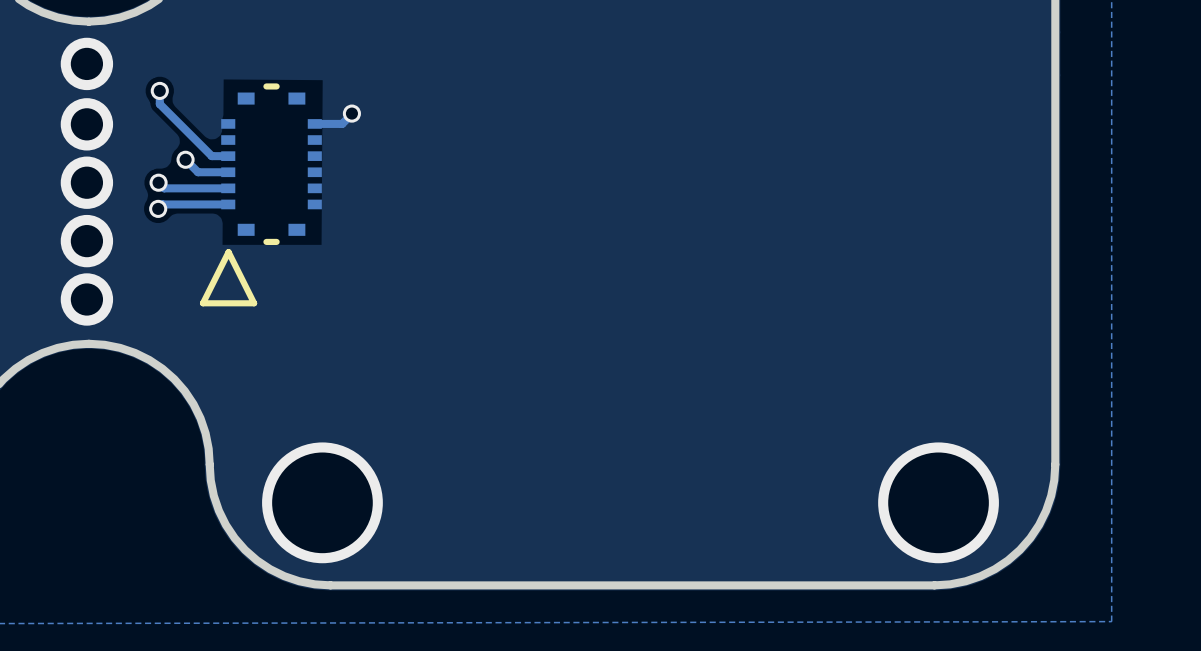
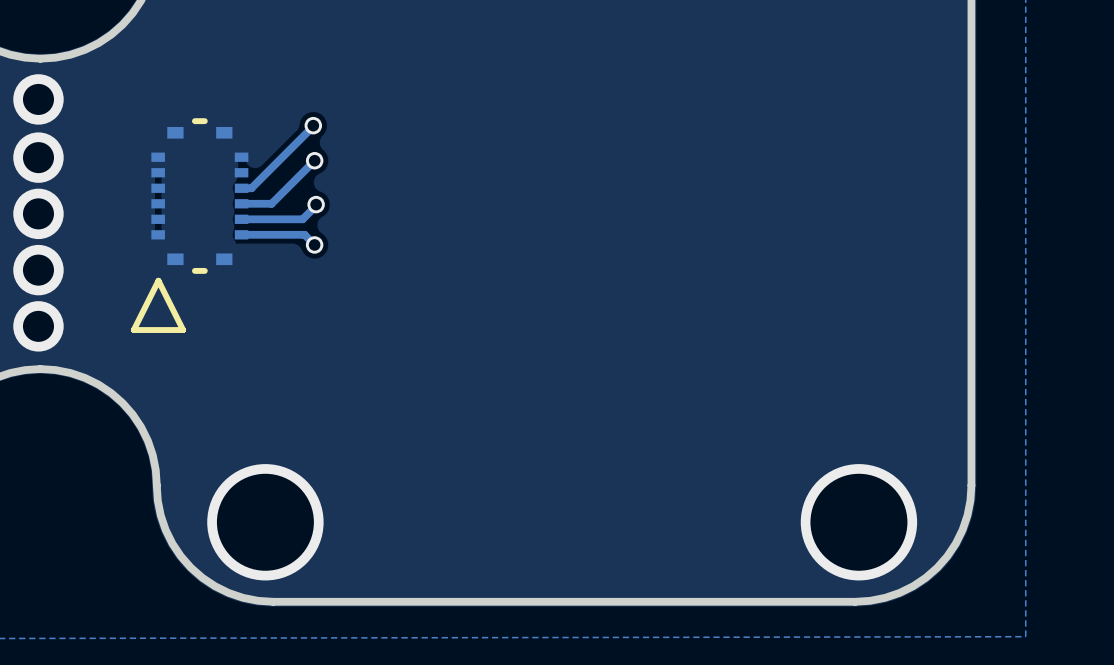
track: (159, 90) (159, 104) (211, 156) (227, 156) -> none
via: (159, 90) -> none
via: none -> (313, 125)
track: none -> (313, 126) (251, 188) (241, 188)
via: (351, 113) -> none
track: (351, 114) (342, 123) (314, 123) -> none
track: none -> (314, 160) (271, 203) (241, 203)
via: none -> (314, 160)
track: (185, 159) (198, 172) (227, 172) -> none
via: (185, 159) -> none
track: none -> (316, 205) (302, 219) (241, 219)
via: none -> (316, 204)
track: (158, 182) (164, 188) (227, 188) -> none
via: (158, 182) -> none
part position: (260, 194) -> (189, 225)
track: (227, 204) (162, 204) (158, 208) -> none
track: none -> (241, 234) (304, 234) (314, 244)
via: (158, 208) -> none
via: none -> (314, 244)

